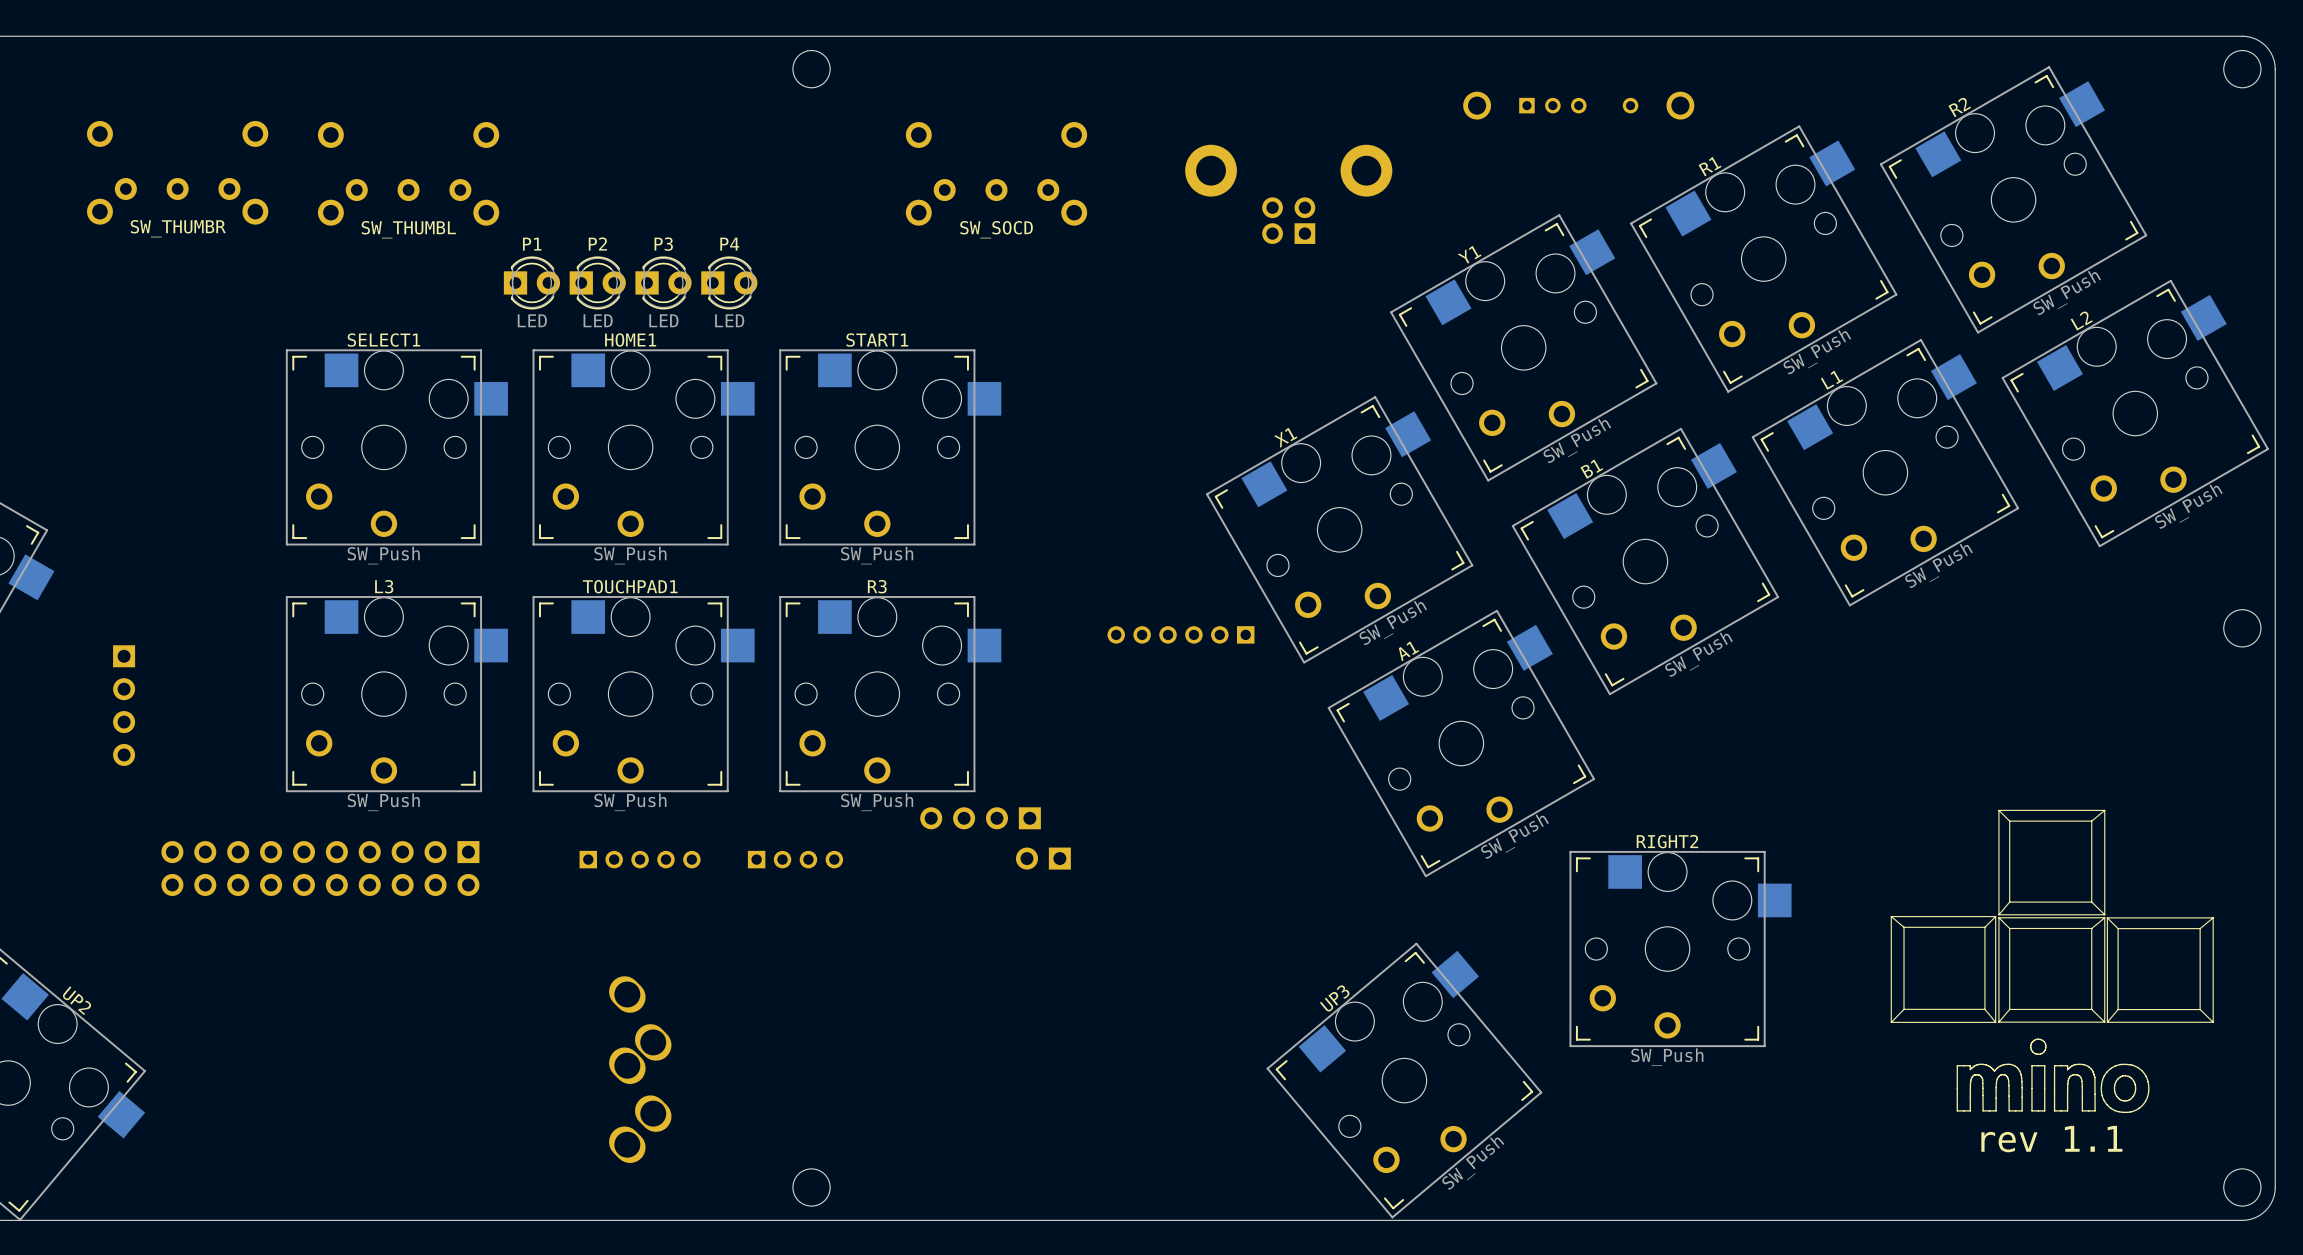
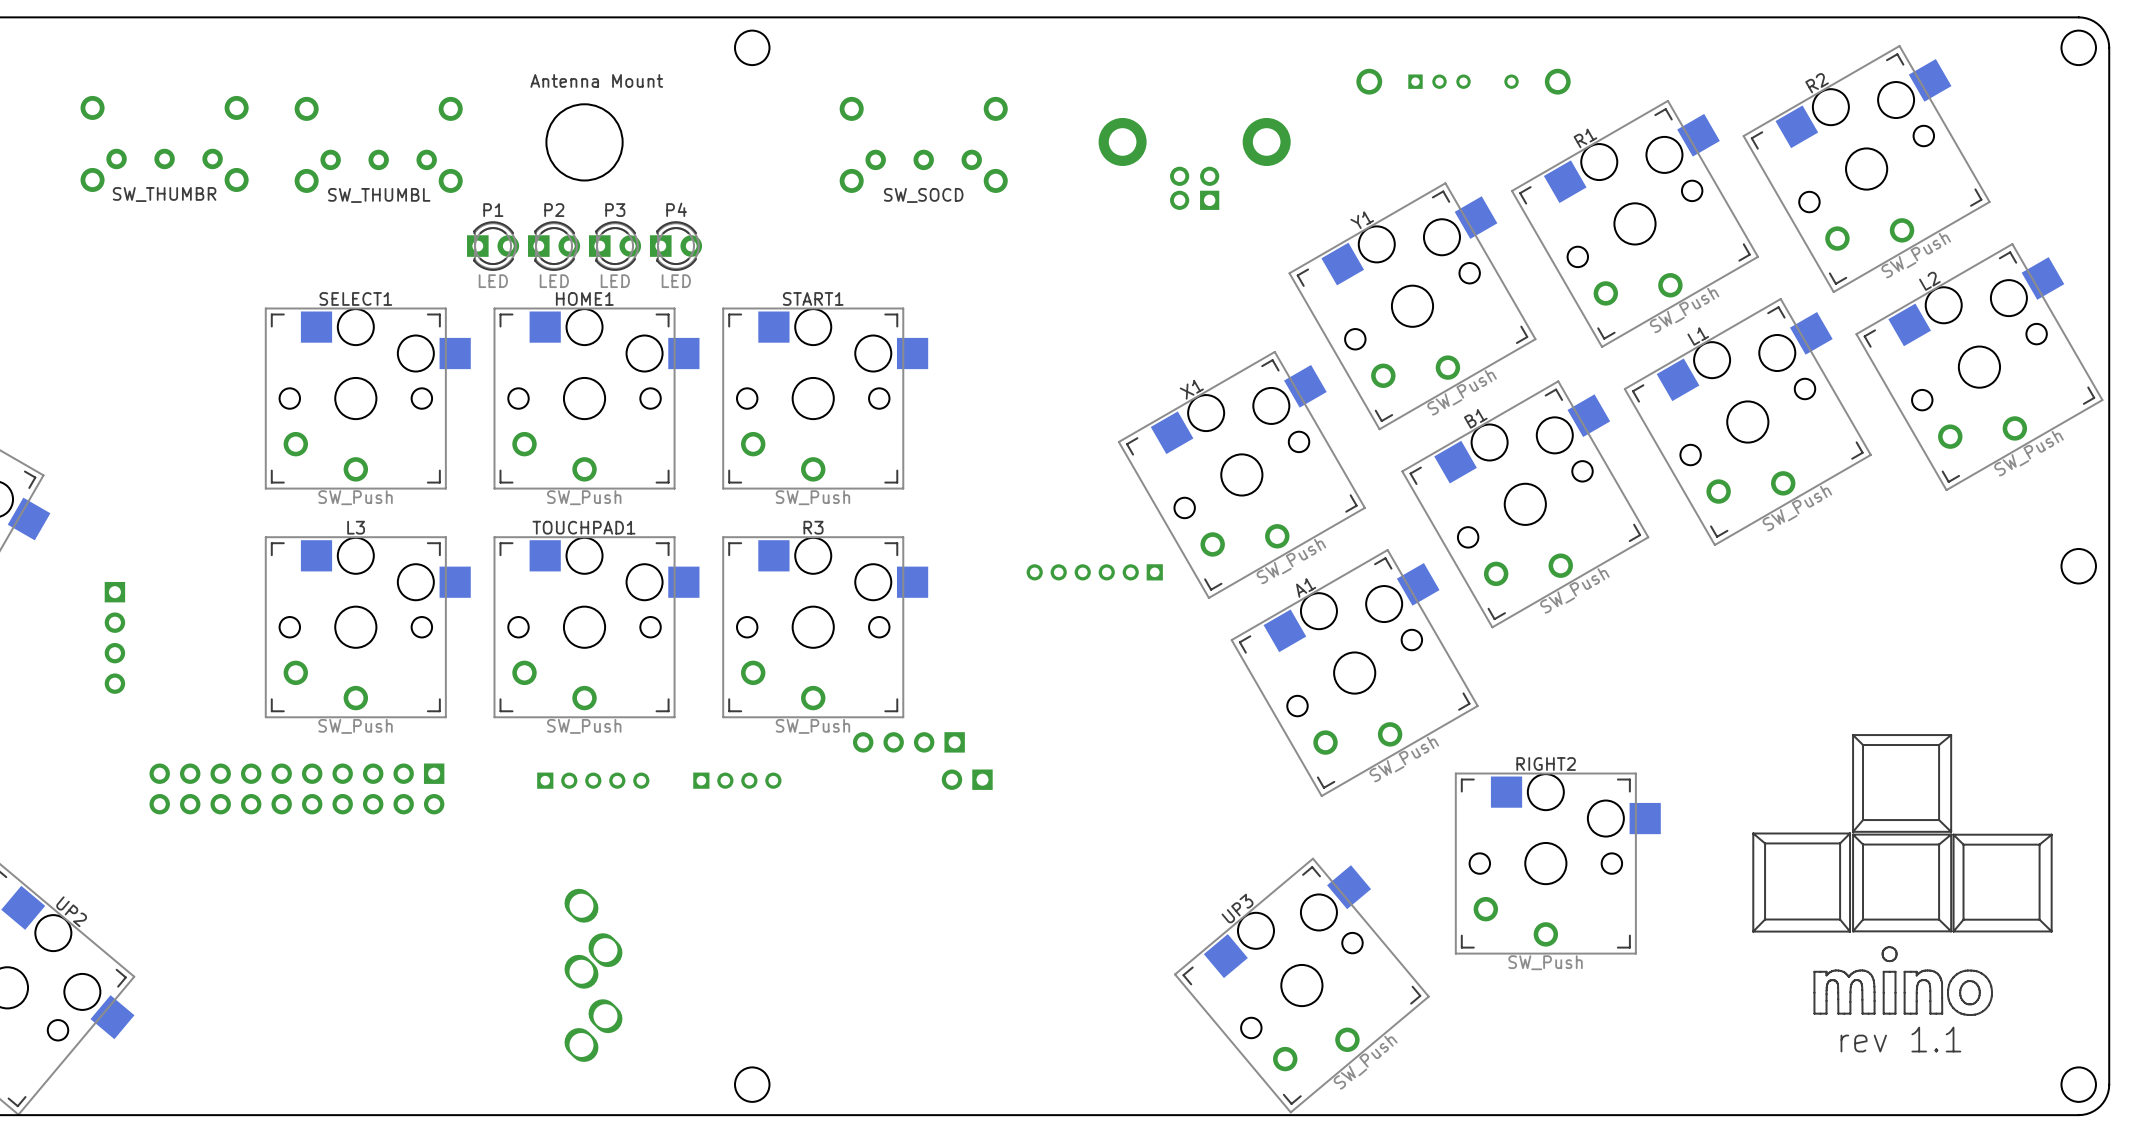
text: none -> Antenna Mount (596, 80)
round board edge: none -> [546, 103, 623, 181]

